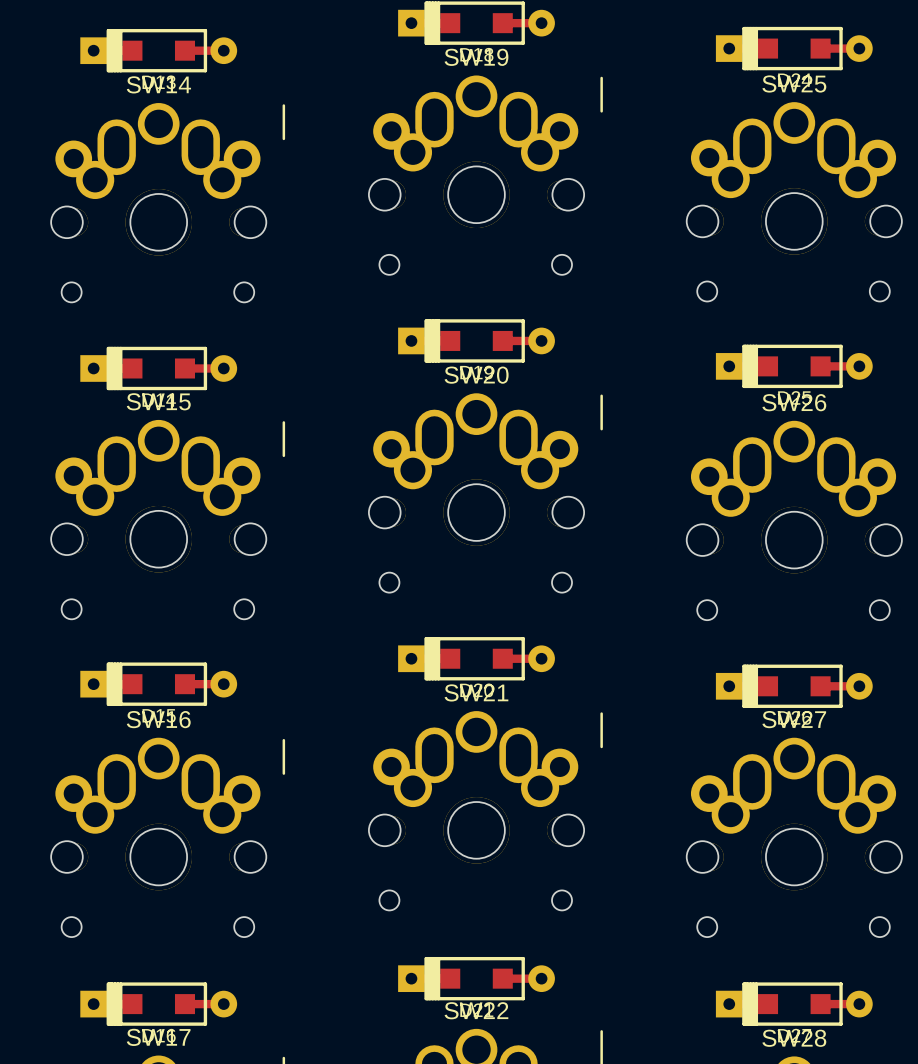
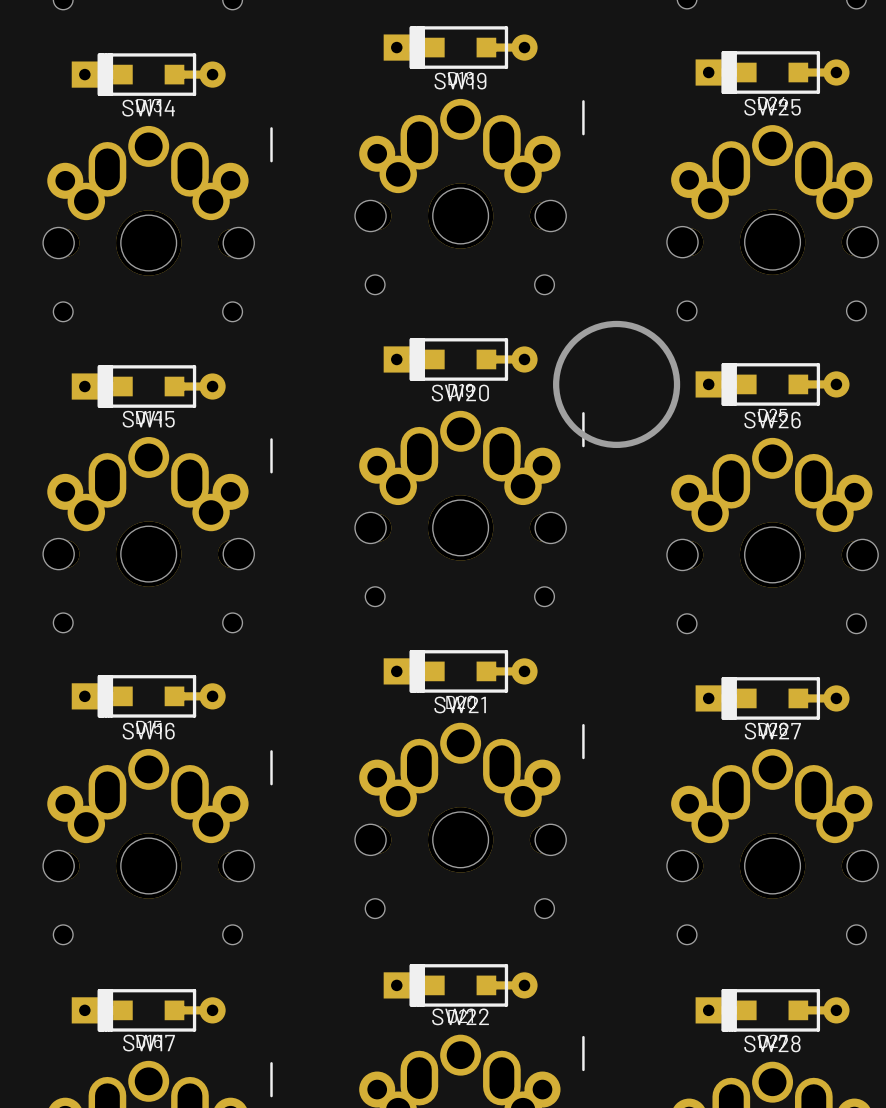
round board edge: none -> [553, 320, 681, 449]

